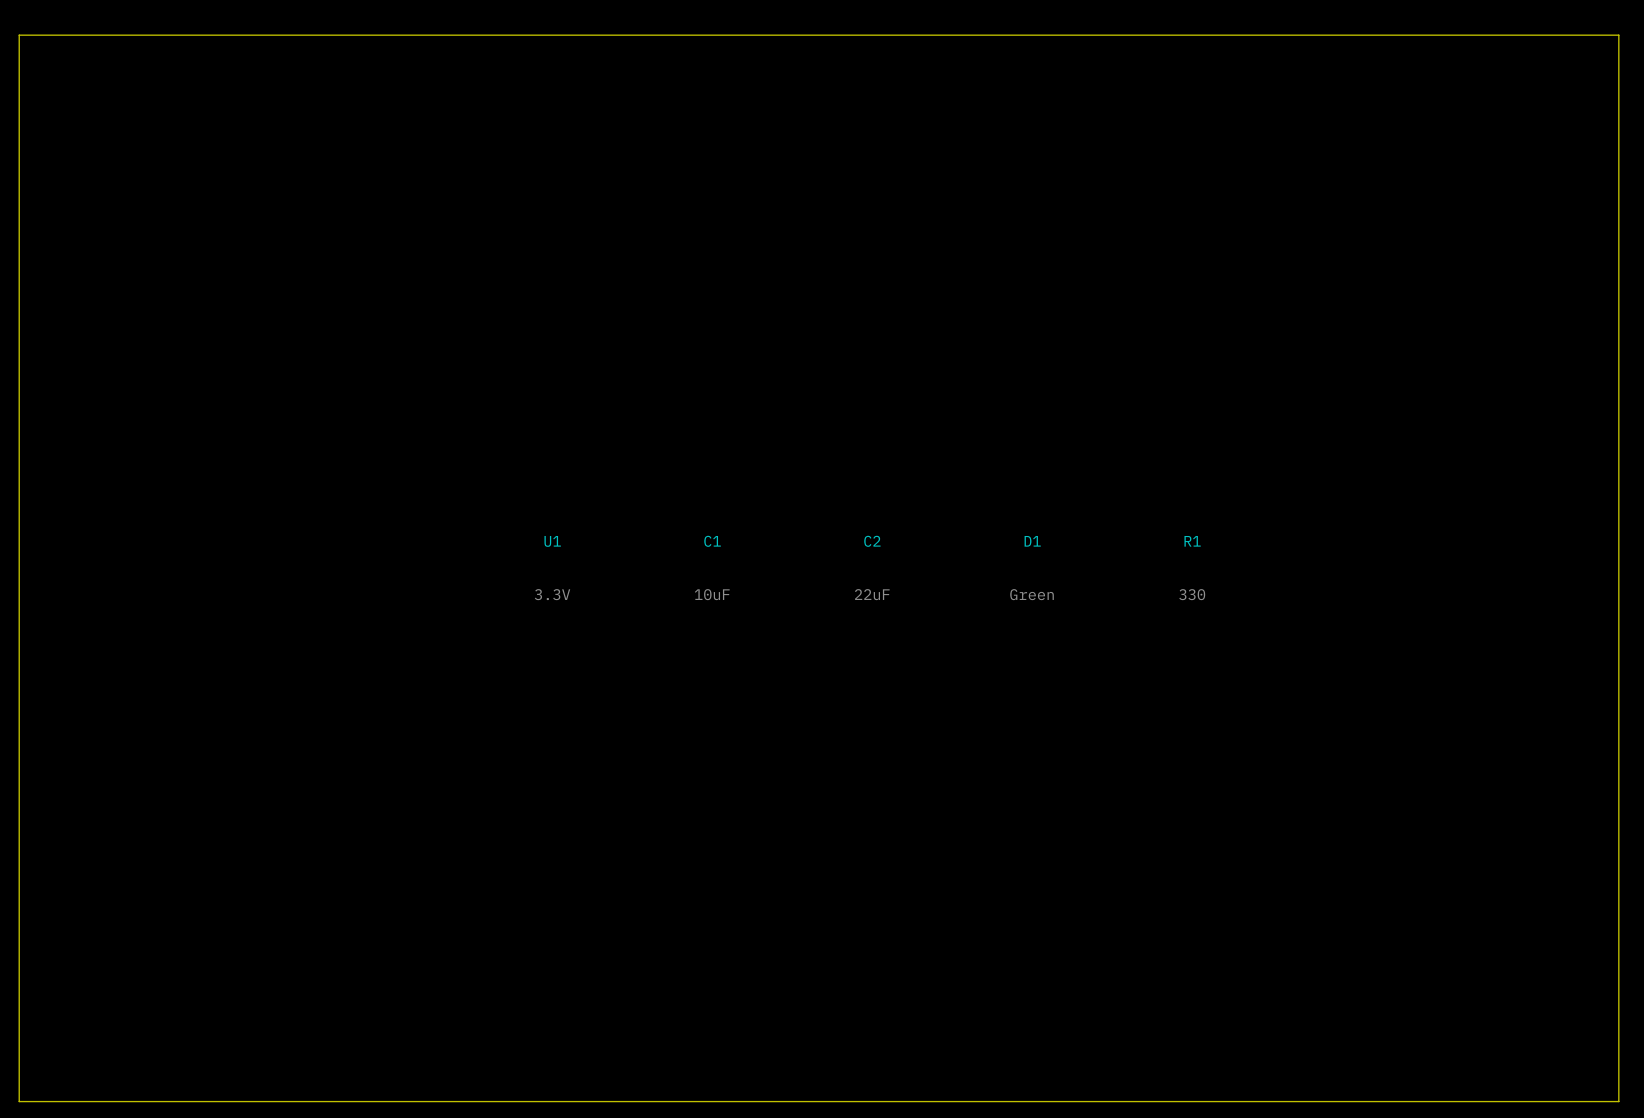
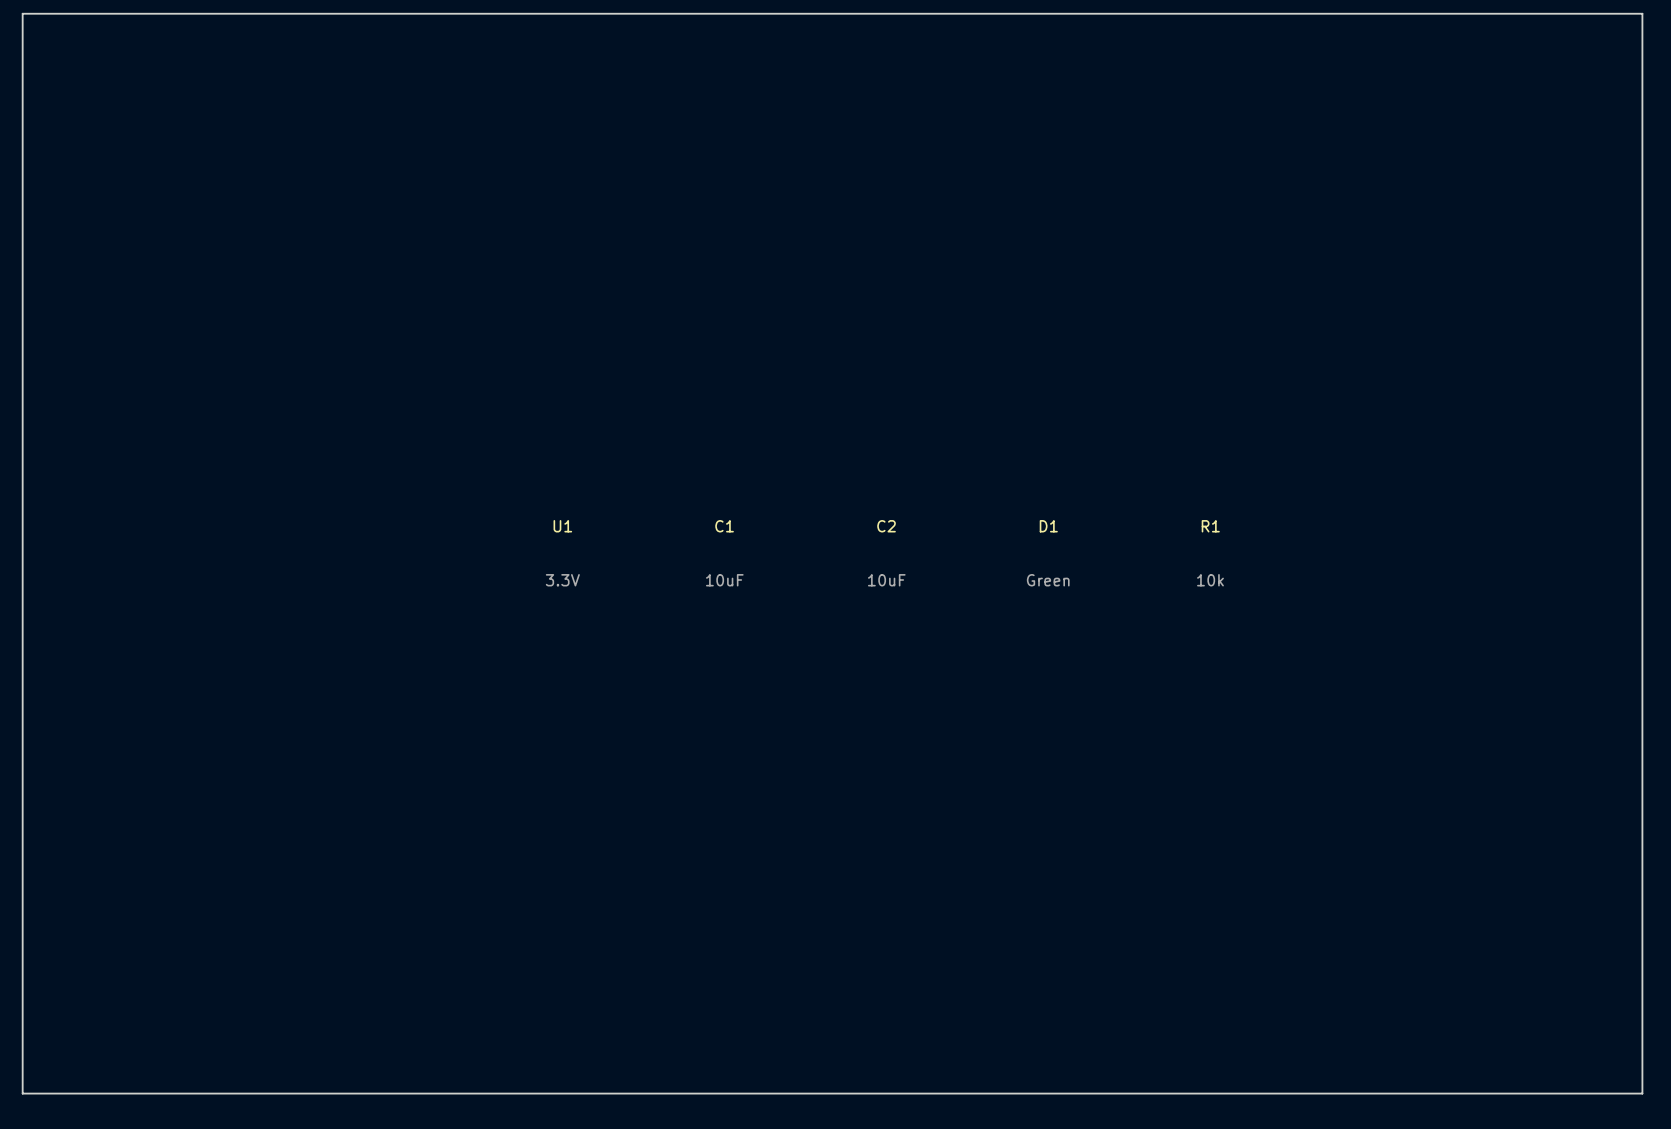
C2 value: 22uF (872, 594) -> 10uF (886, 580)
R1 value: 330 (1192, 594) -> 10k (1210, 580)

